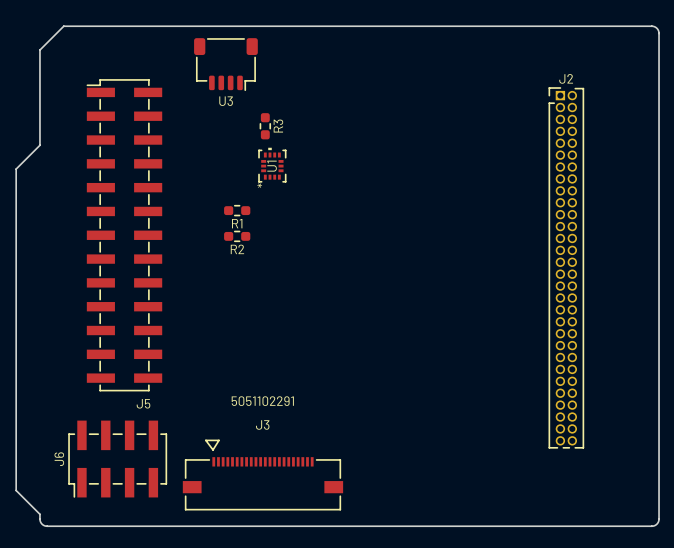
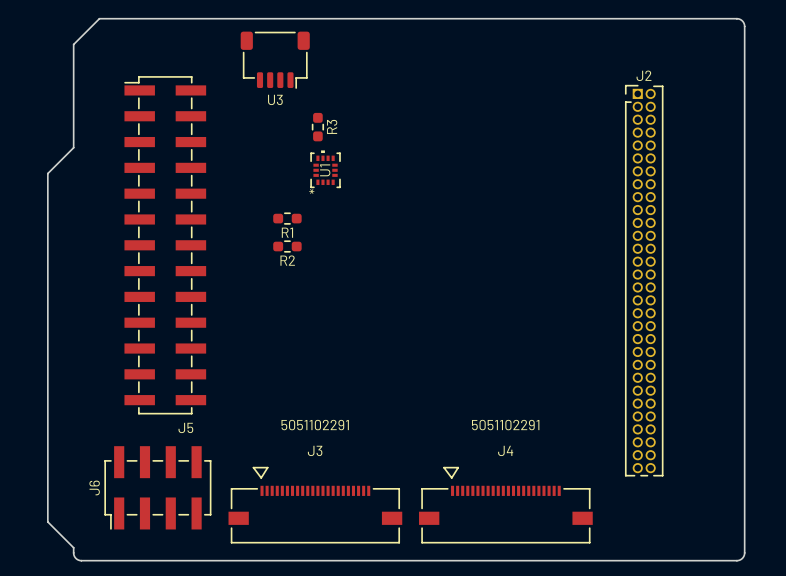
J4: none -> (505, 505)

